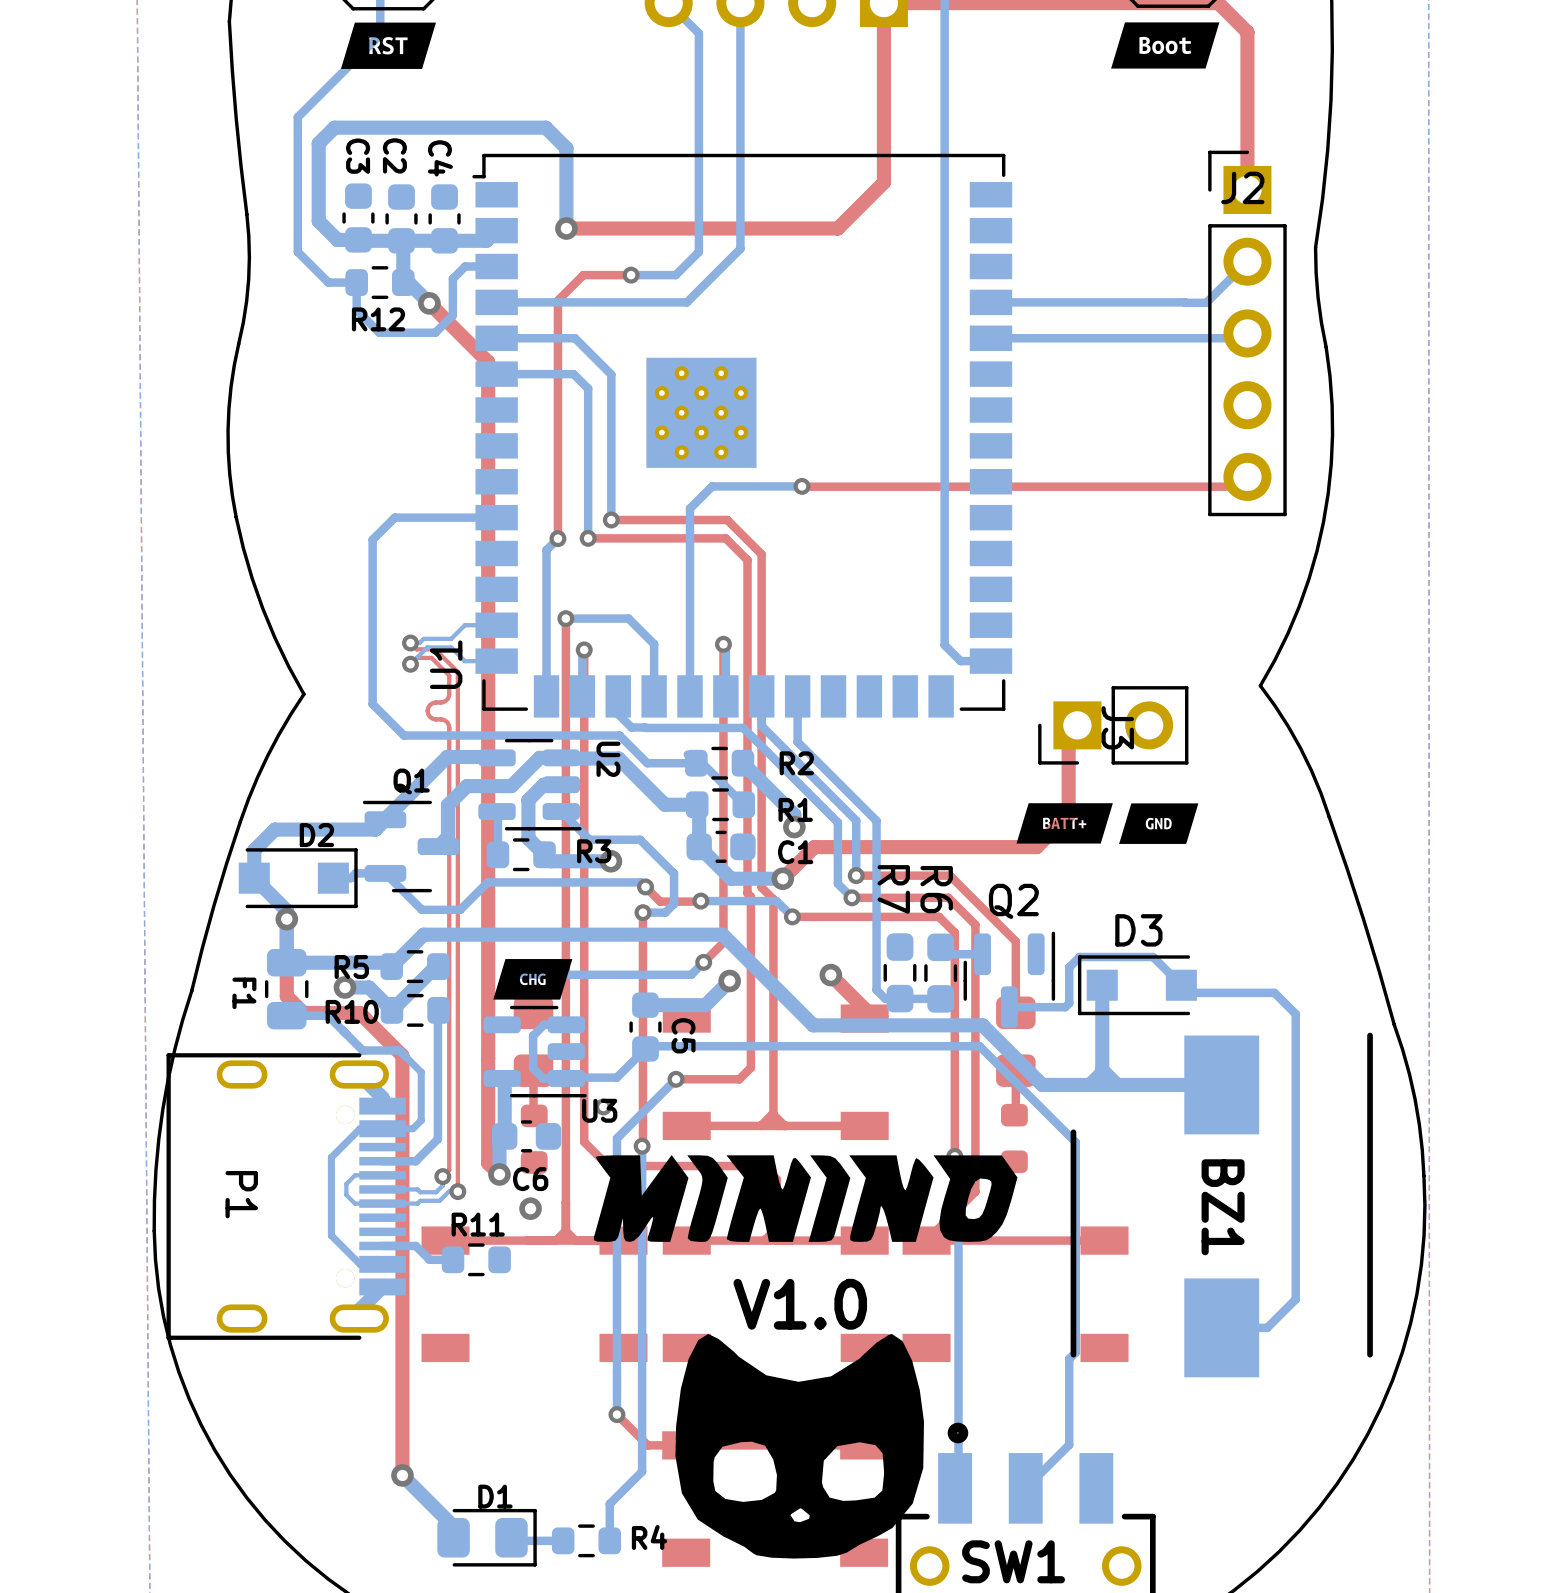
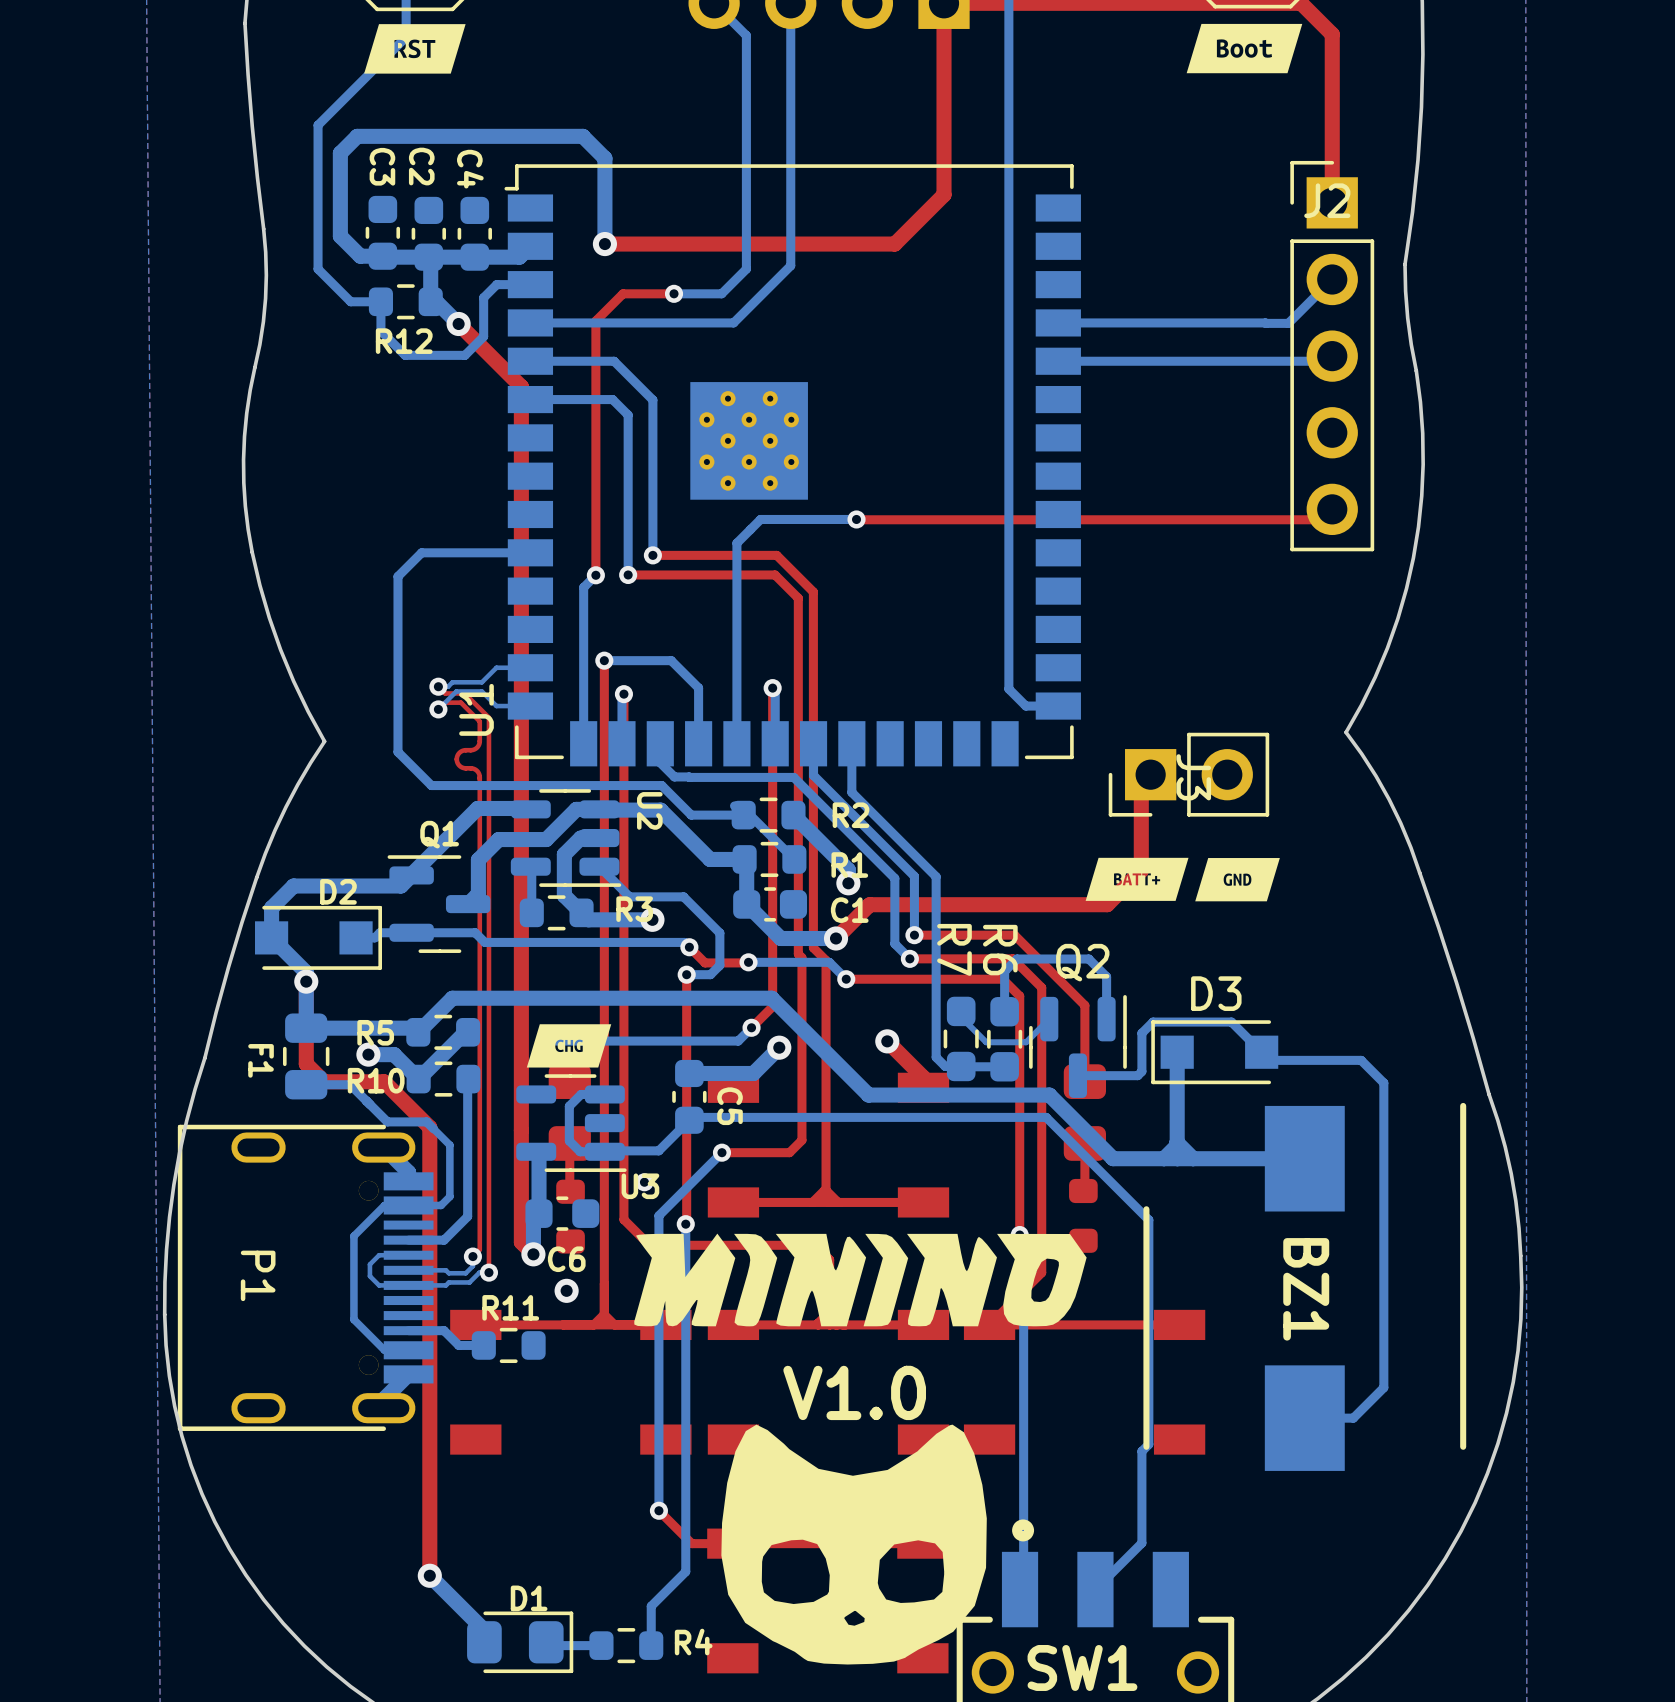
bottom track: (385, 873) (421, 909) (460, 909) (487, 882) -> (411, 932) (475, 932) (484, 942) (520, 942)
bottom track: none -> (1004, 1011) (1004, 971) (1017, 959) (1088, 959) (1106, 976) (1106, 1019)
bottom track: (982, 954) (947, 954) -> (1049, 1019) (1026, 1042) (986, 1042) (961, 1017) (961, 1011)

